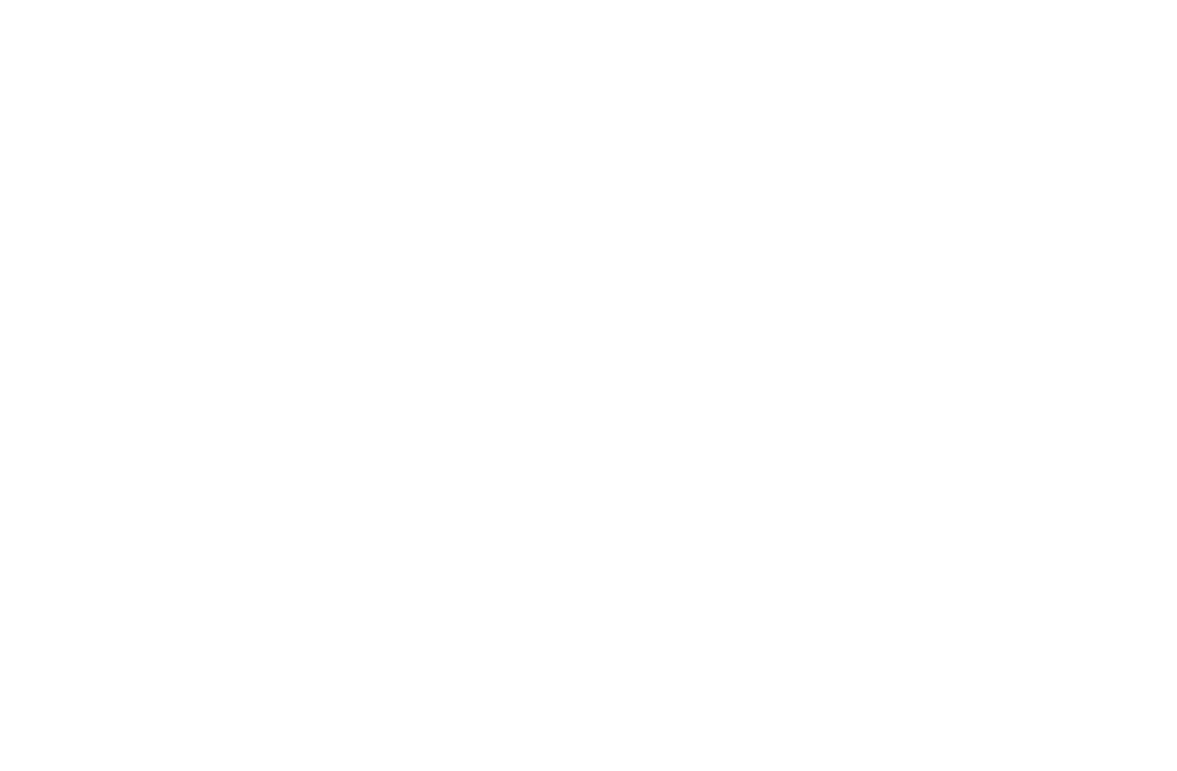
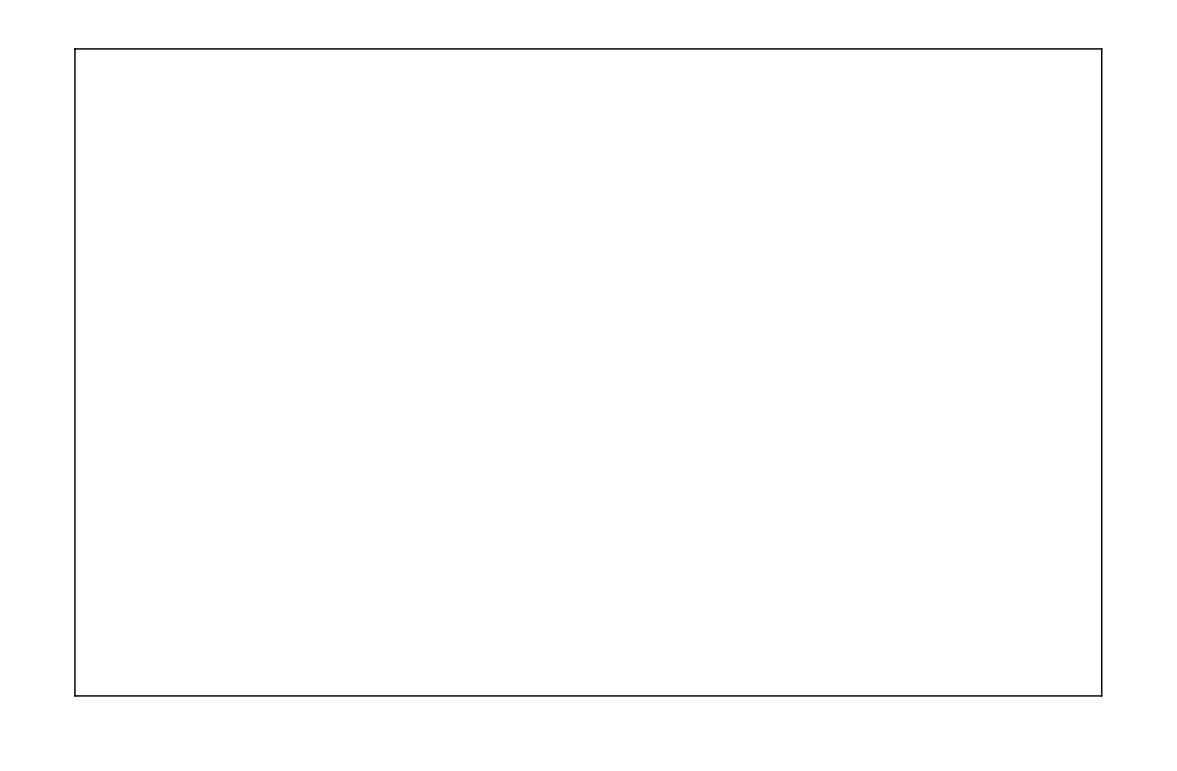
board edge: none -> (1101, 48) (74, 48) (74, 695) (1101, 695) (1101, 48)

